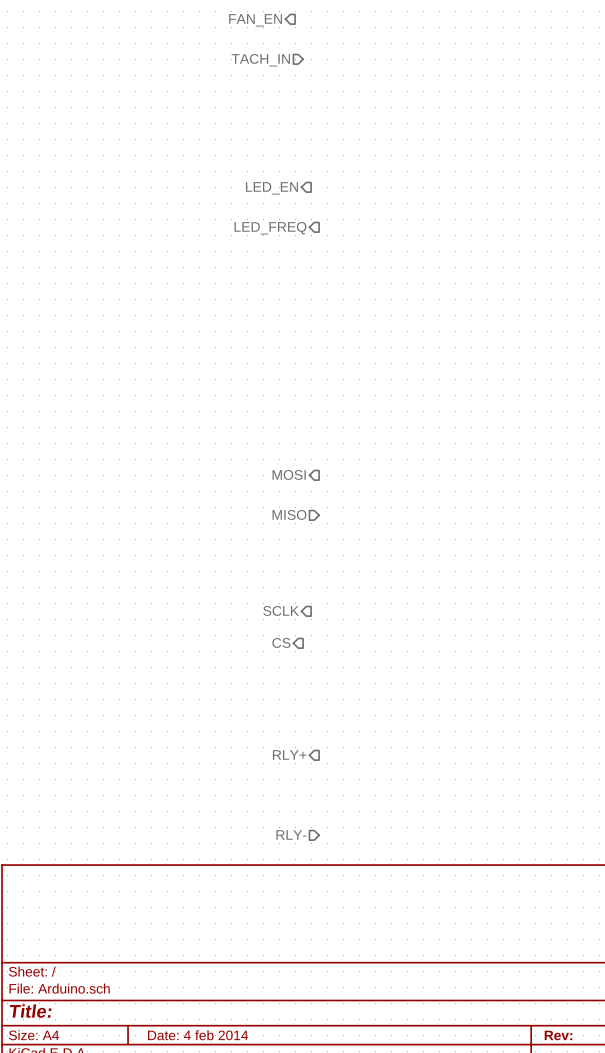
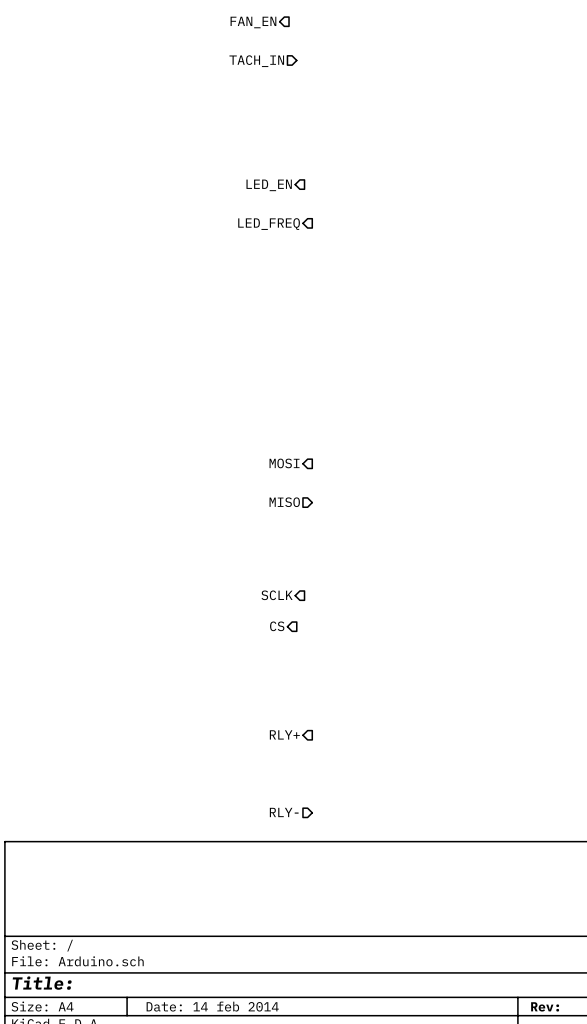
title block: Date: 4 feb 2014 (198, 1035) -> Date: 14 feb 2014 (212, 1006)

